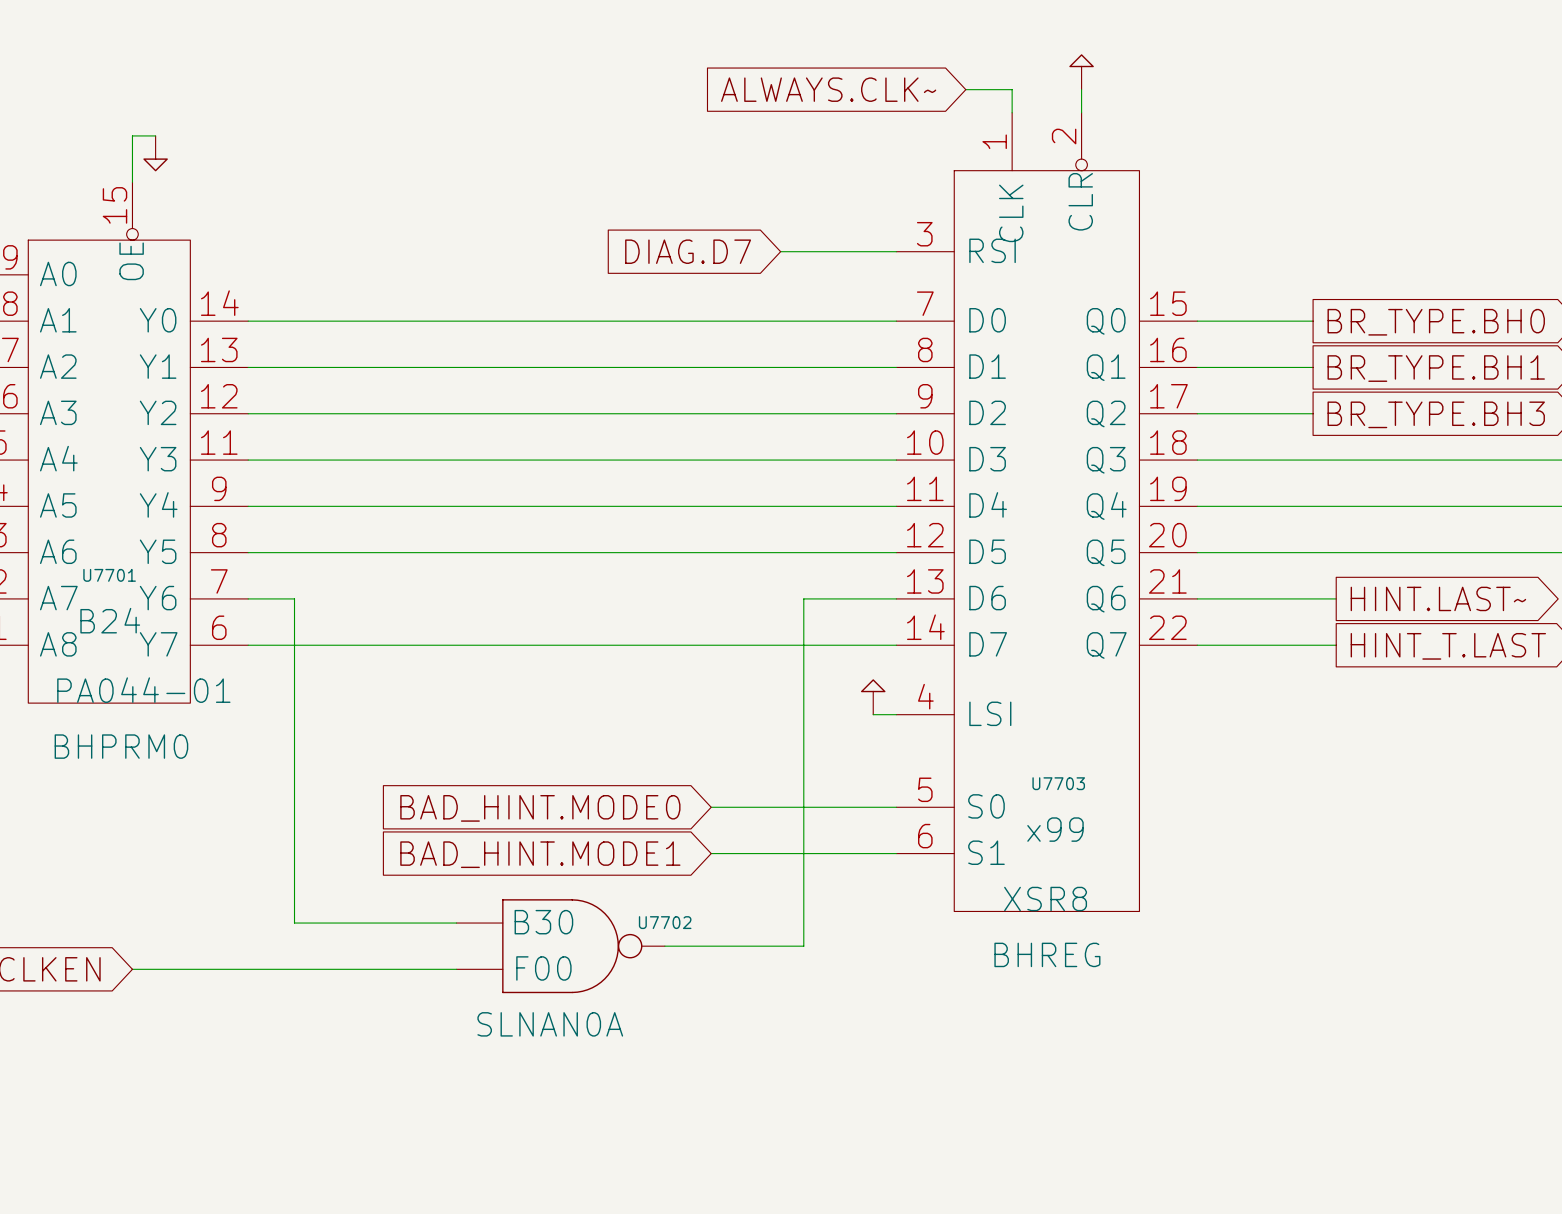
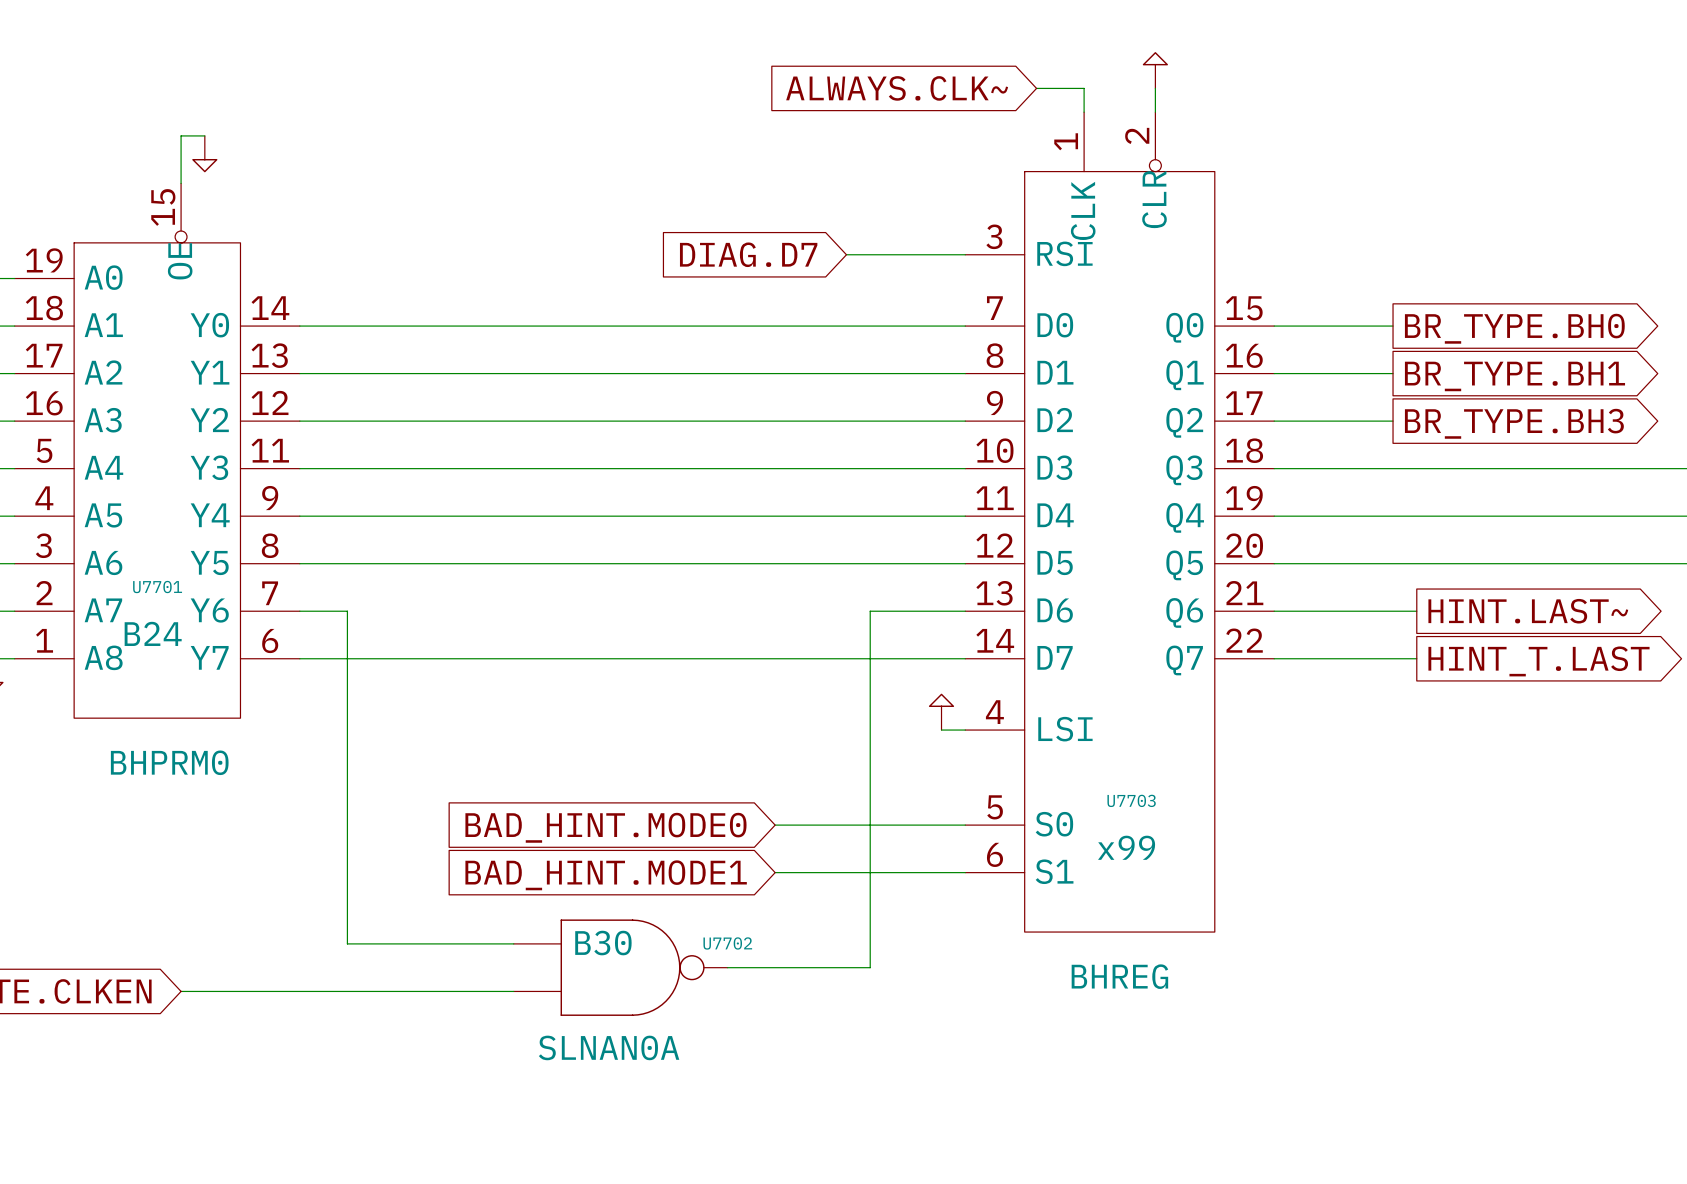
U7701 value: PA044-01 (143, 690) -> none
U7703 value: XSR8 (1045, 899) -> none
U7702 value: F00 (543, 968) -> none

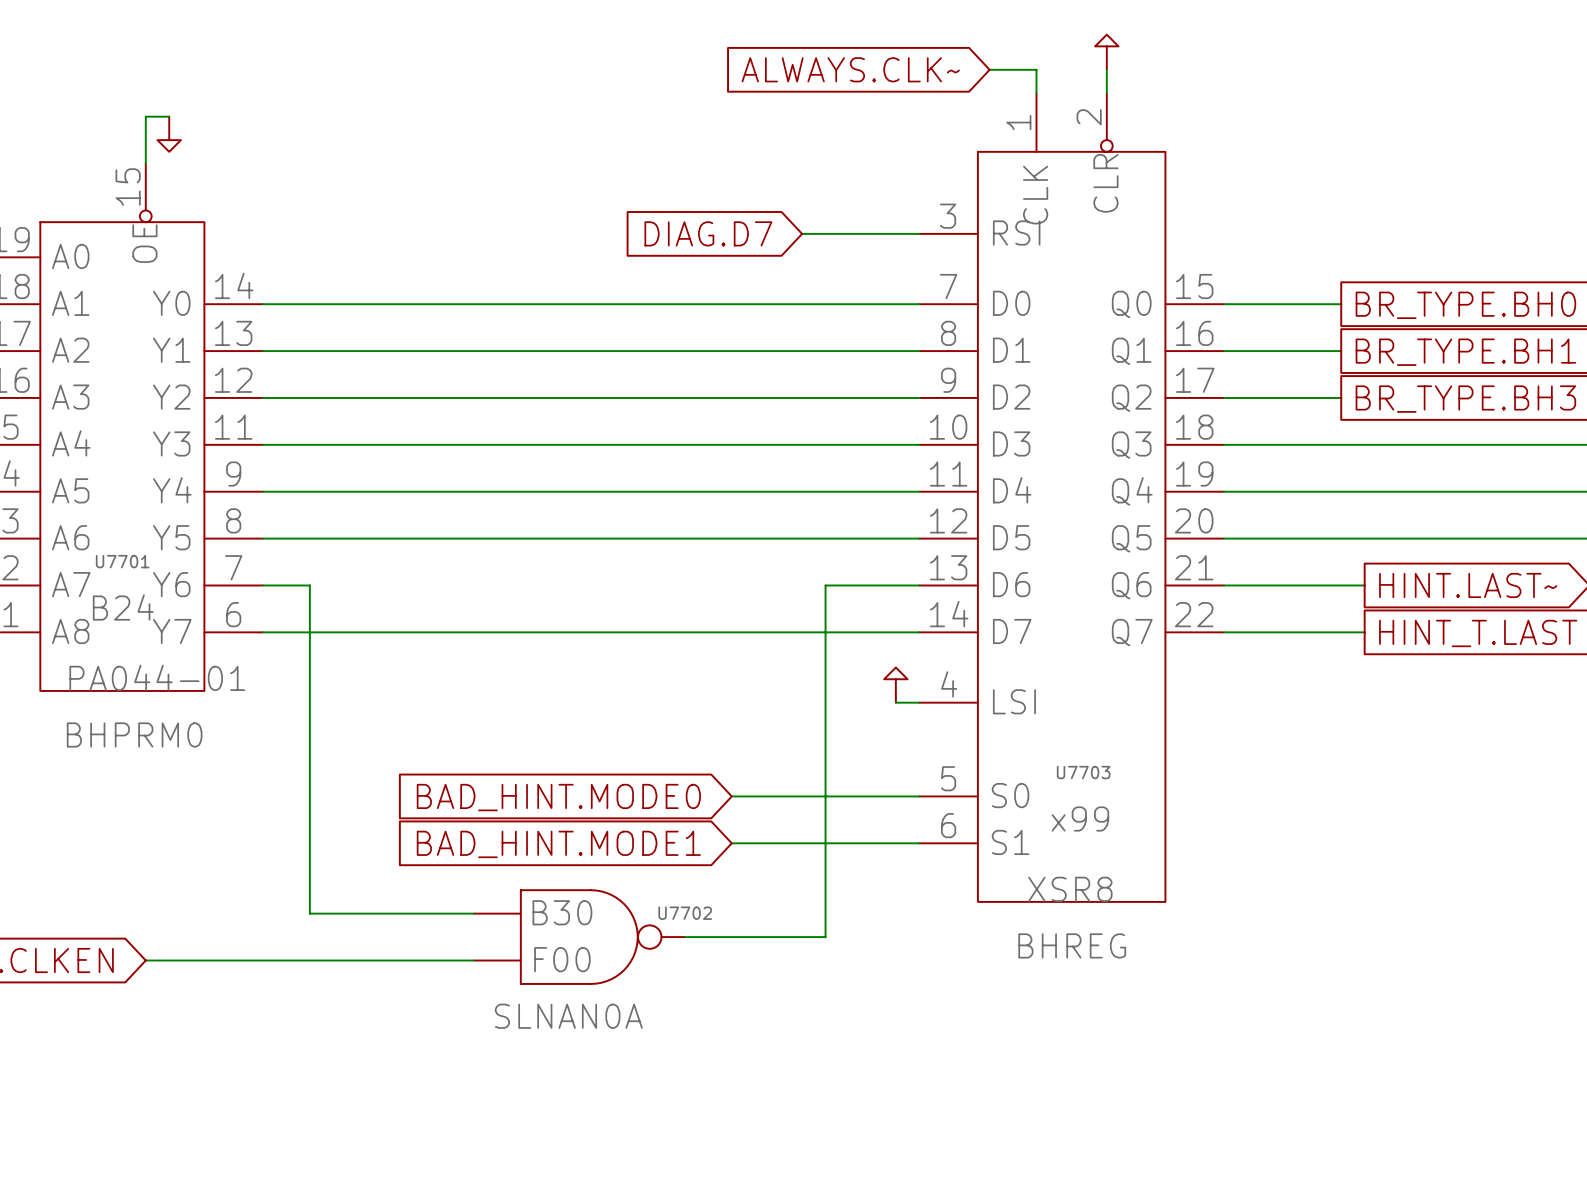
U7701 value: none -> PA044-01 (157, 677)
U7703 value: none -> XSR8 (1070, 889)
U7702 value: none -> F00 (562, 959)

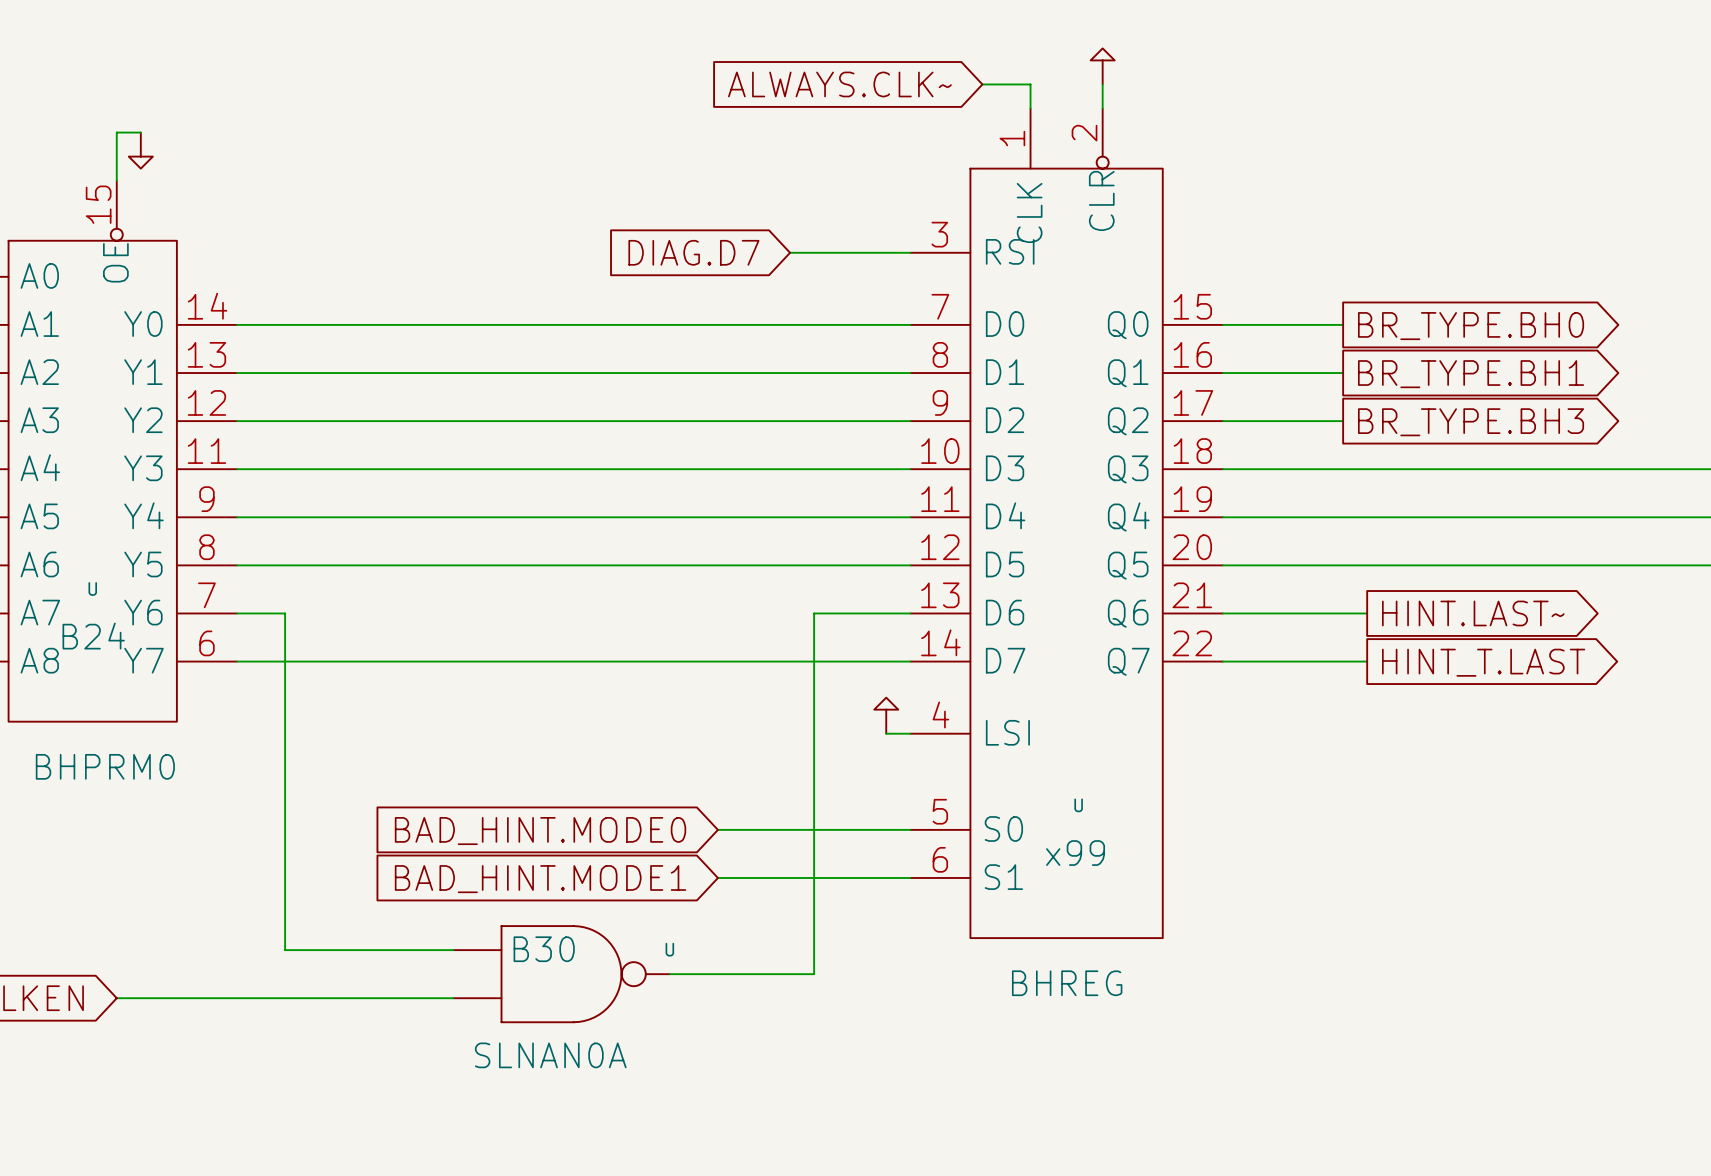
U7701 name: U7701 (122, 561) -> U (92, 588)
U7701 value: PA044-01 (157, 677) -> none
U7703 name: U7703 (1083, 772) -> U (1078, 805)
U7703 value: XSR8 (1070, 889) -> none
U7702 name: U7702 (685, 913) -> U (669, 949)
U7702 value: F00 (562, 959) -> none

